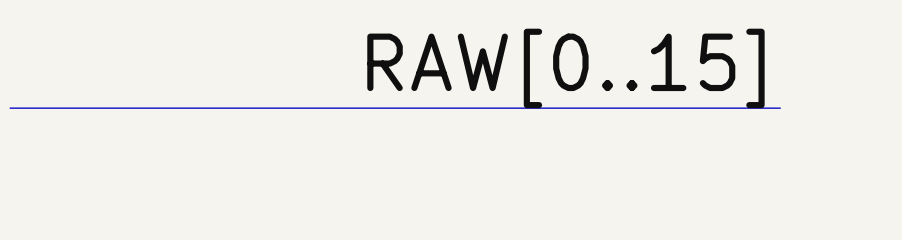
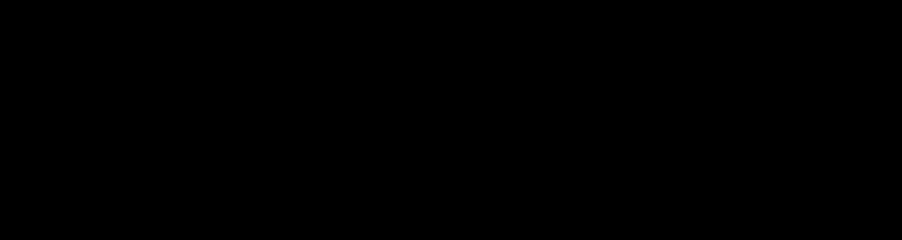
label: RAW[0..15] (565, 68) -> none
bus: (10, 108) (780, 108) -> none

